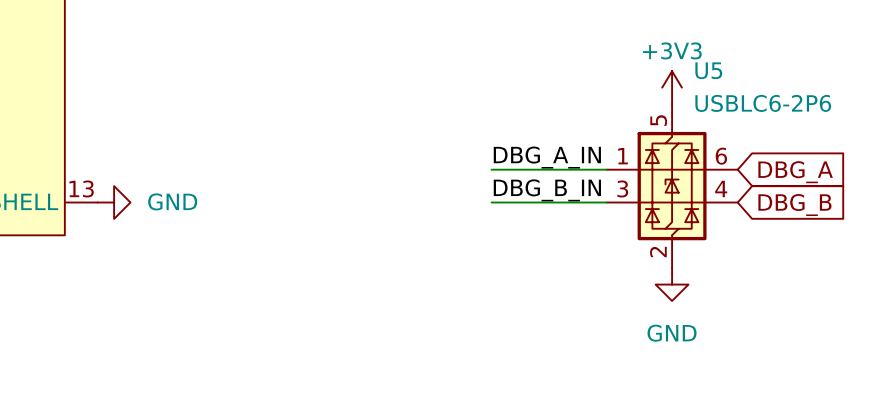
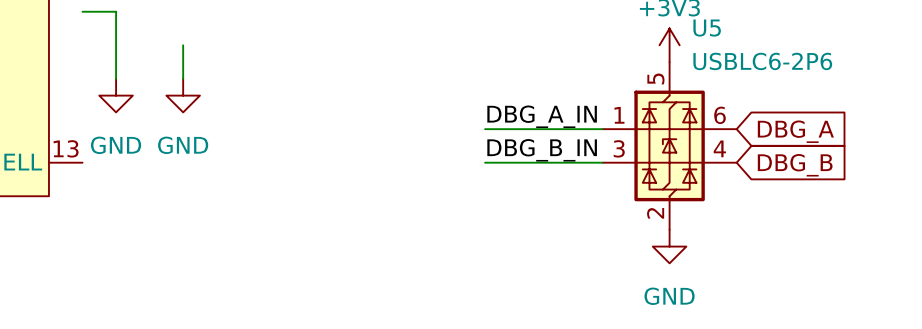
wire: none -> (82, 11) (116, 11) (116, 78)
wire: none -> (183, 45) (183, 78)
power symbol: none -> GND (116, 95)
power symbol: none -> GND (183, 95)
power symbol: GND (114, 202) -> none

